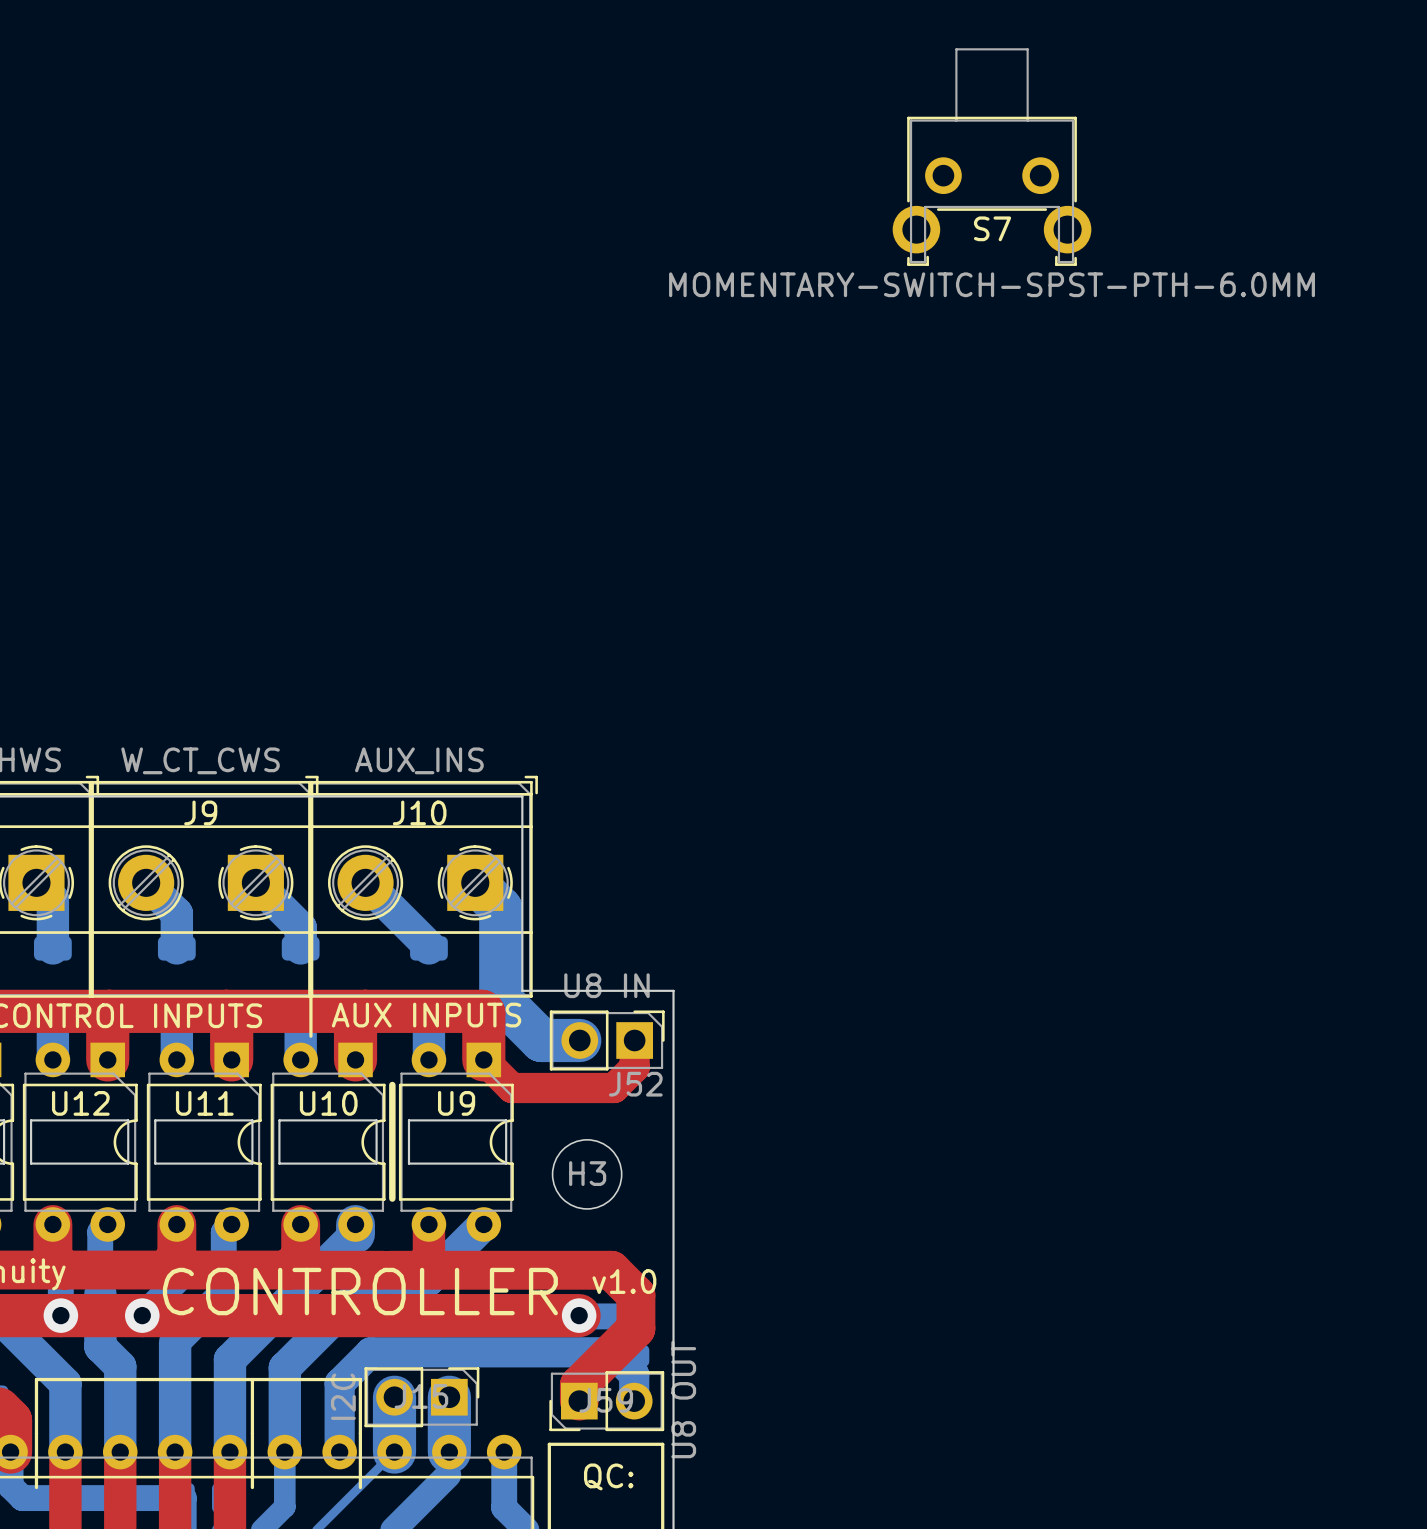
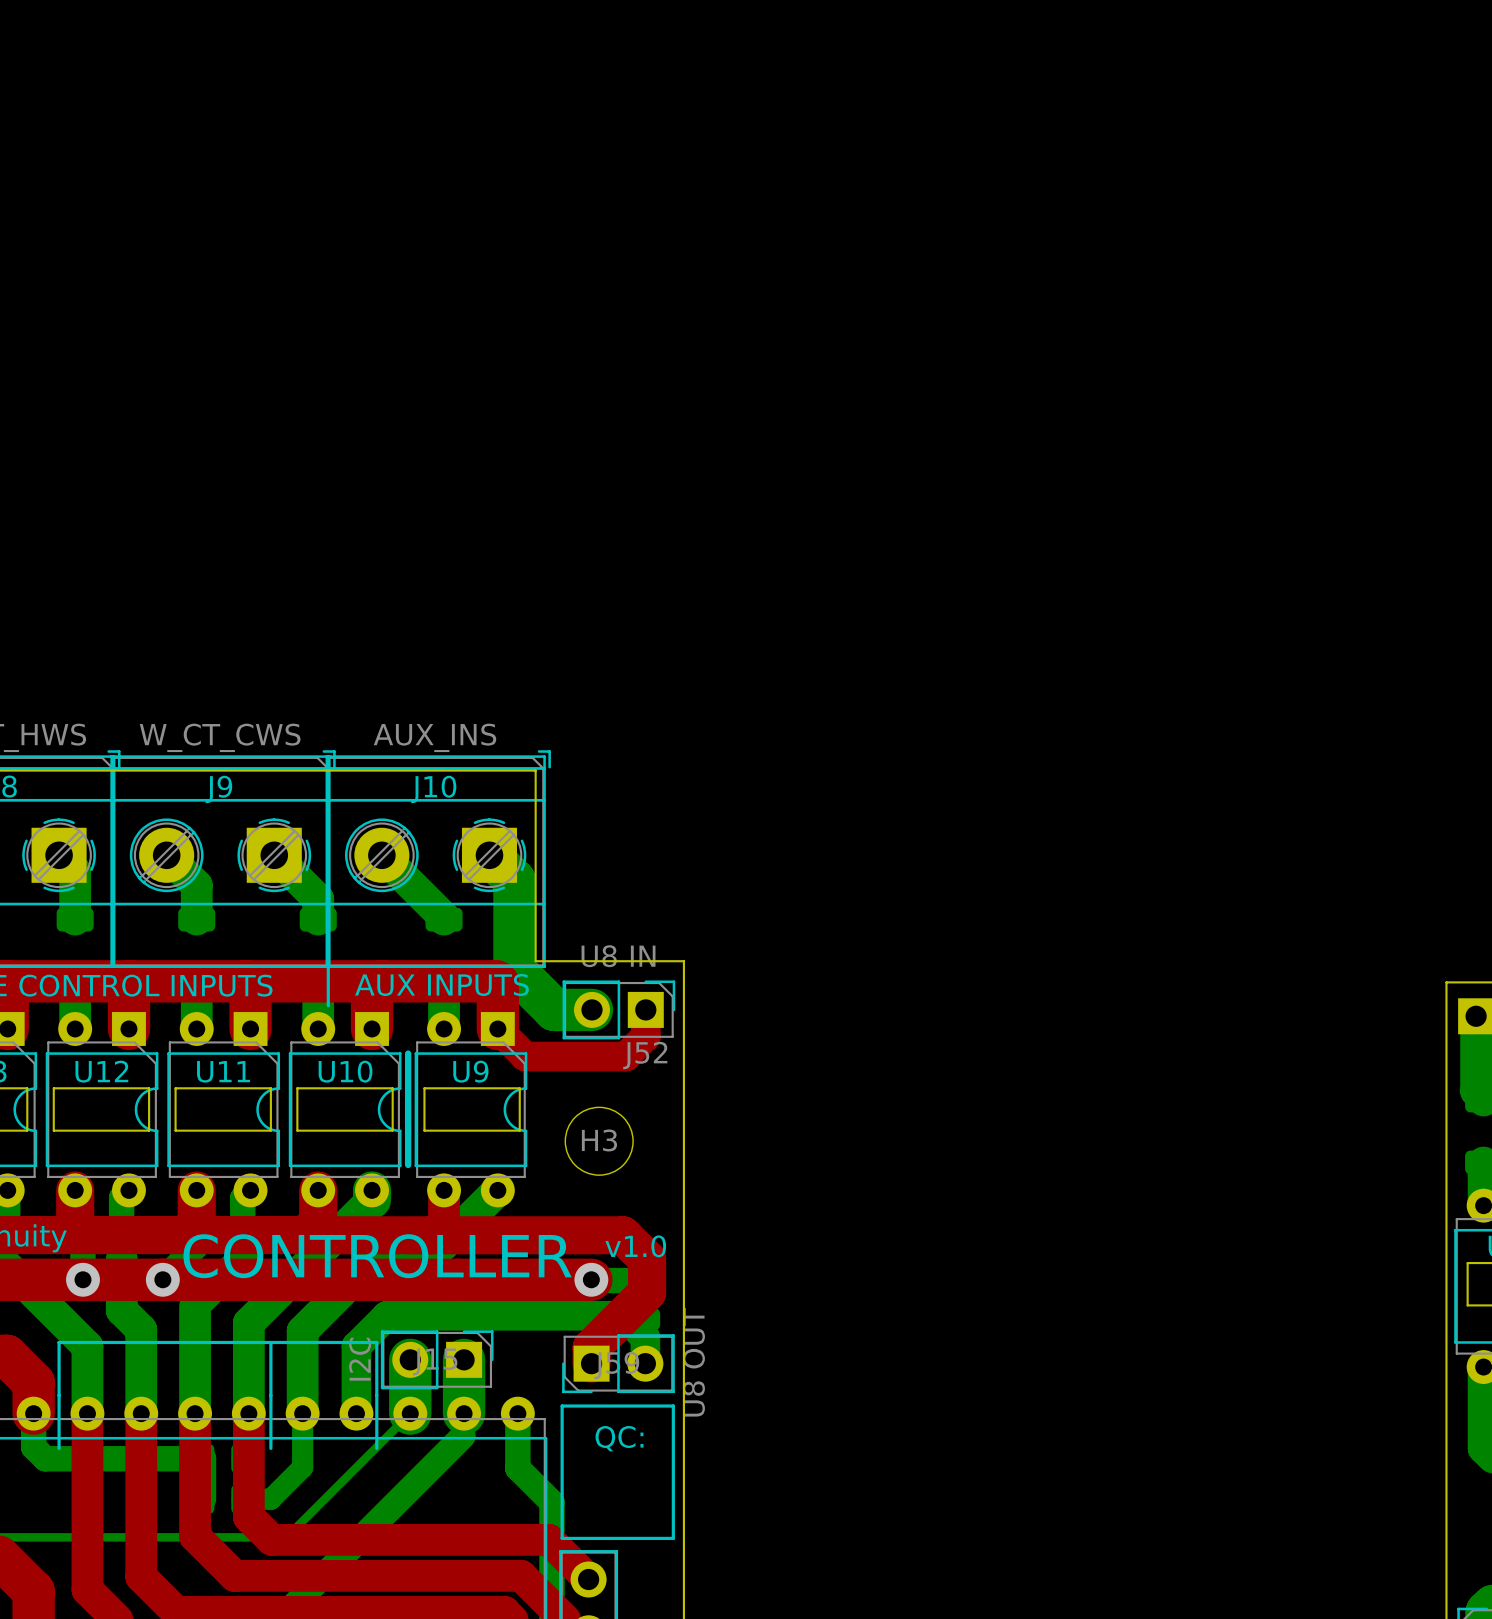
S7: MOMENTARY-SWITCH-SPST-PTH-6.0MM (992, 157) -> none

